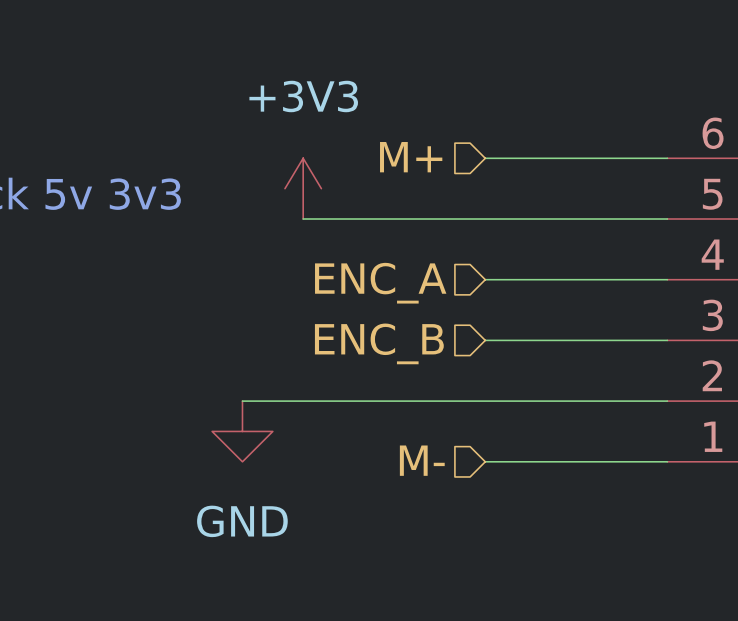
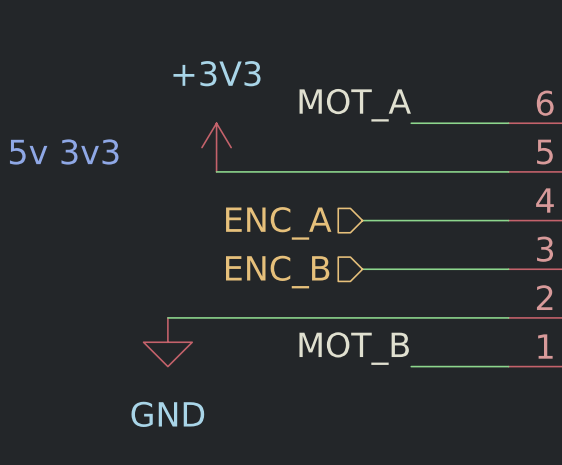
label: none -> MOT_A (355, 105)
hierarchical label: M+ (411, 157) -> none
wire: (485, 158) (545, 158) -> none
label: none -> MOT_B (354, 348)
hierarchical label: M- (422, 460) -> none
wire: (485, 461) (545, 461) -> none

